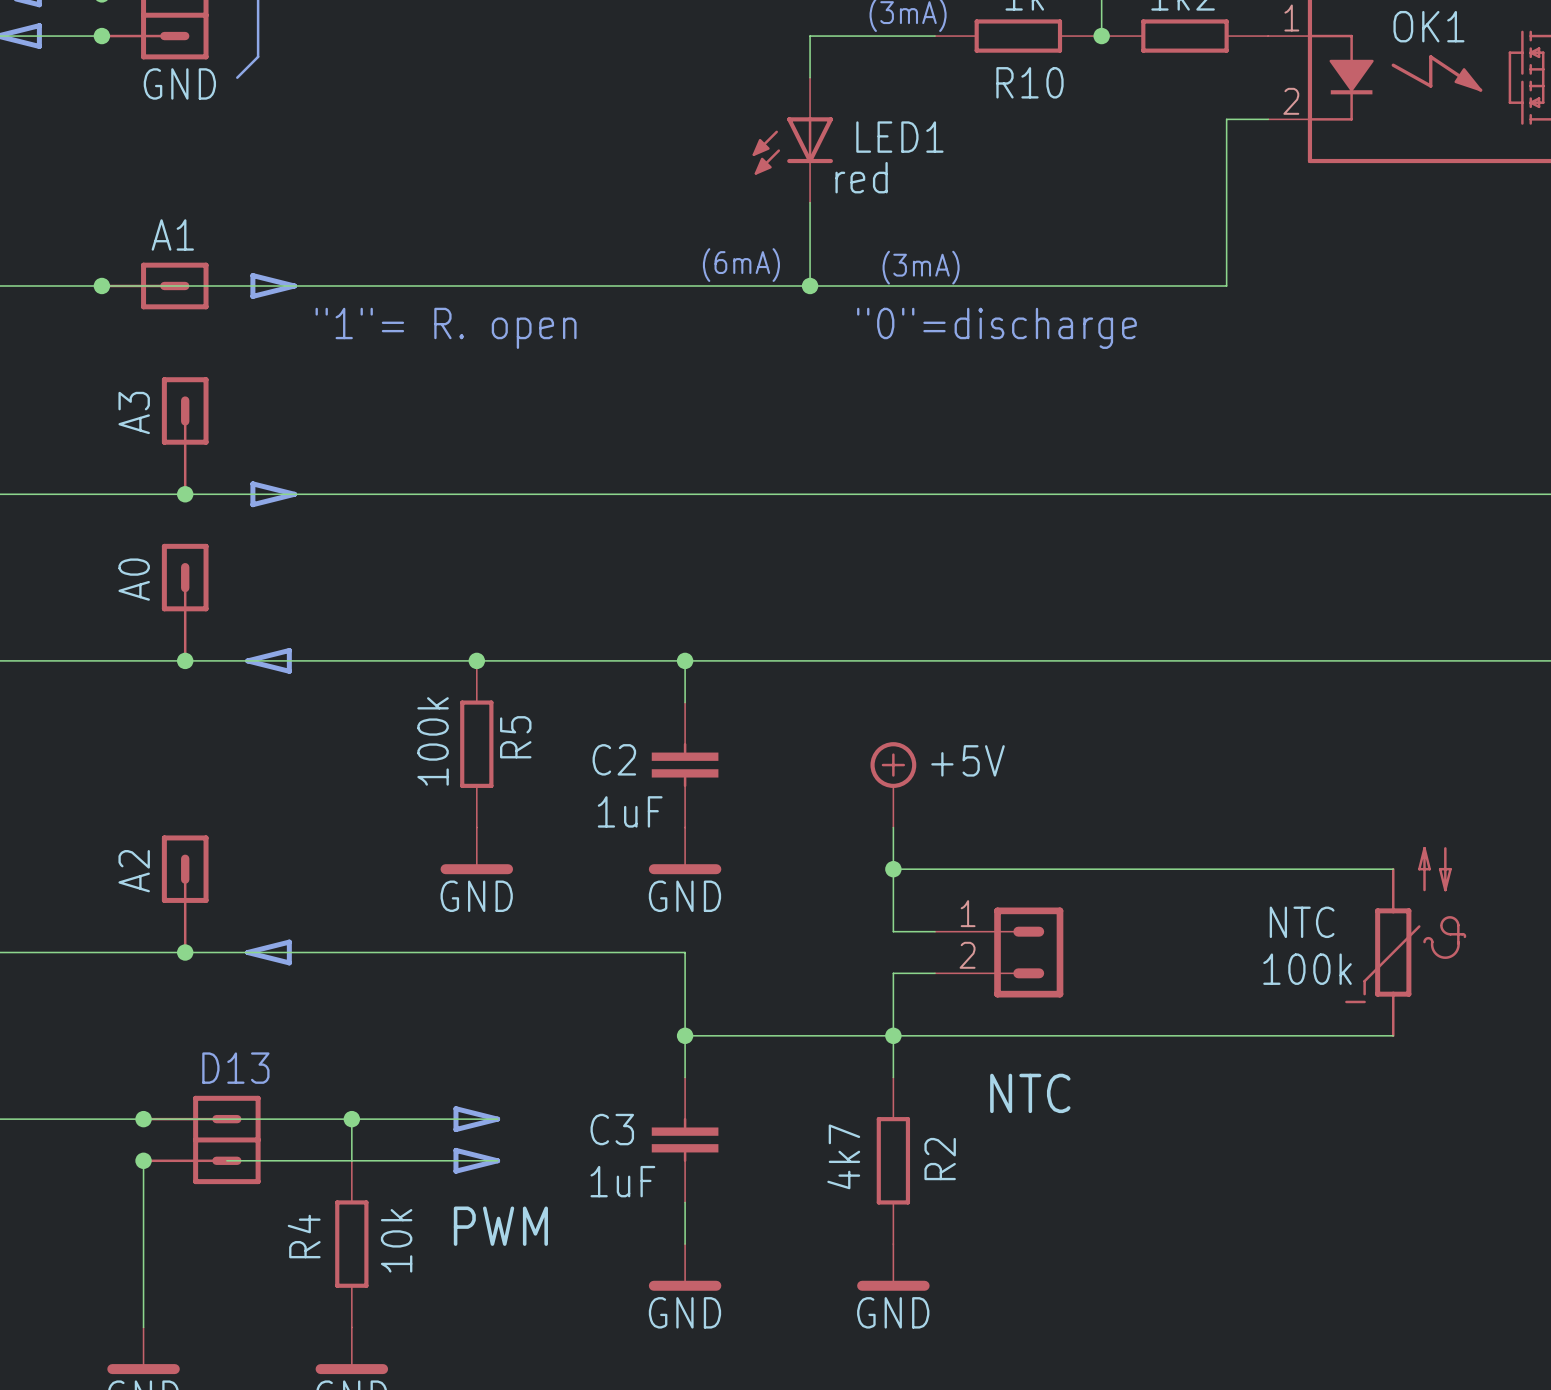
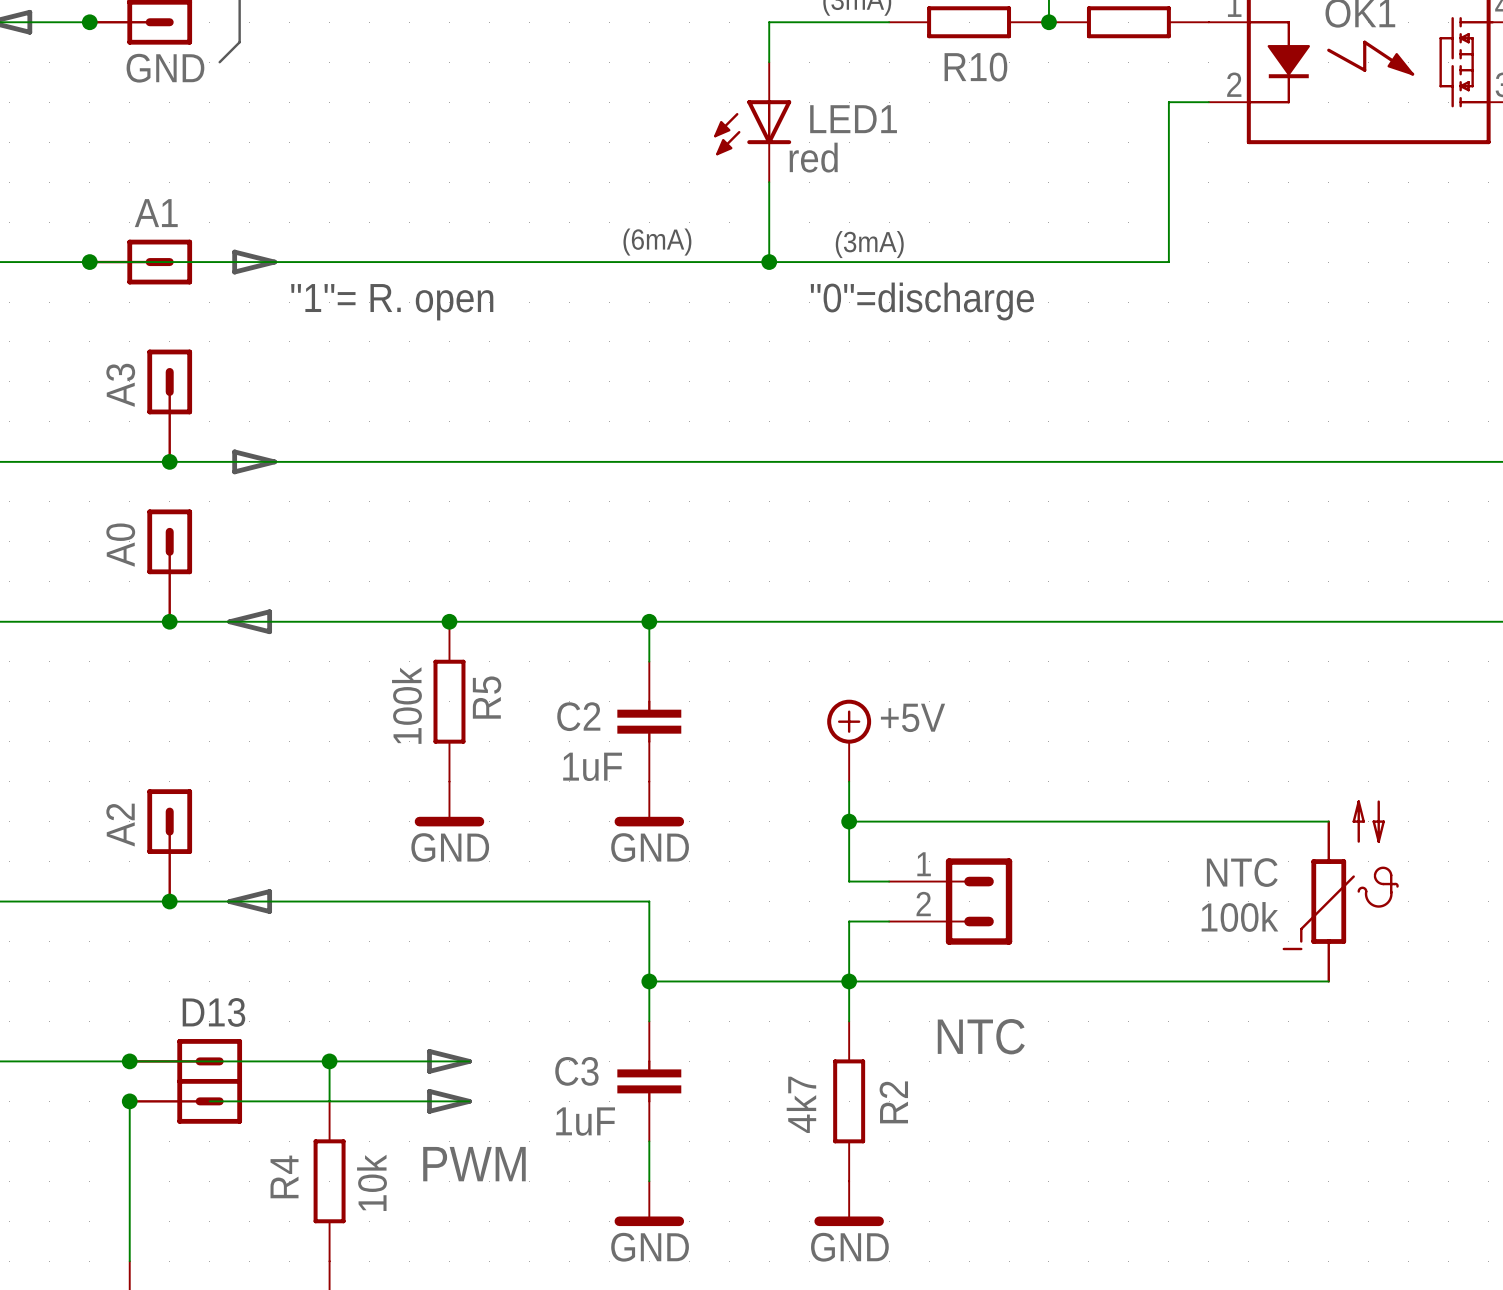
text position: (6mA) (741, 265) -> (6mA) (657, 242)

